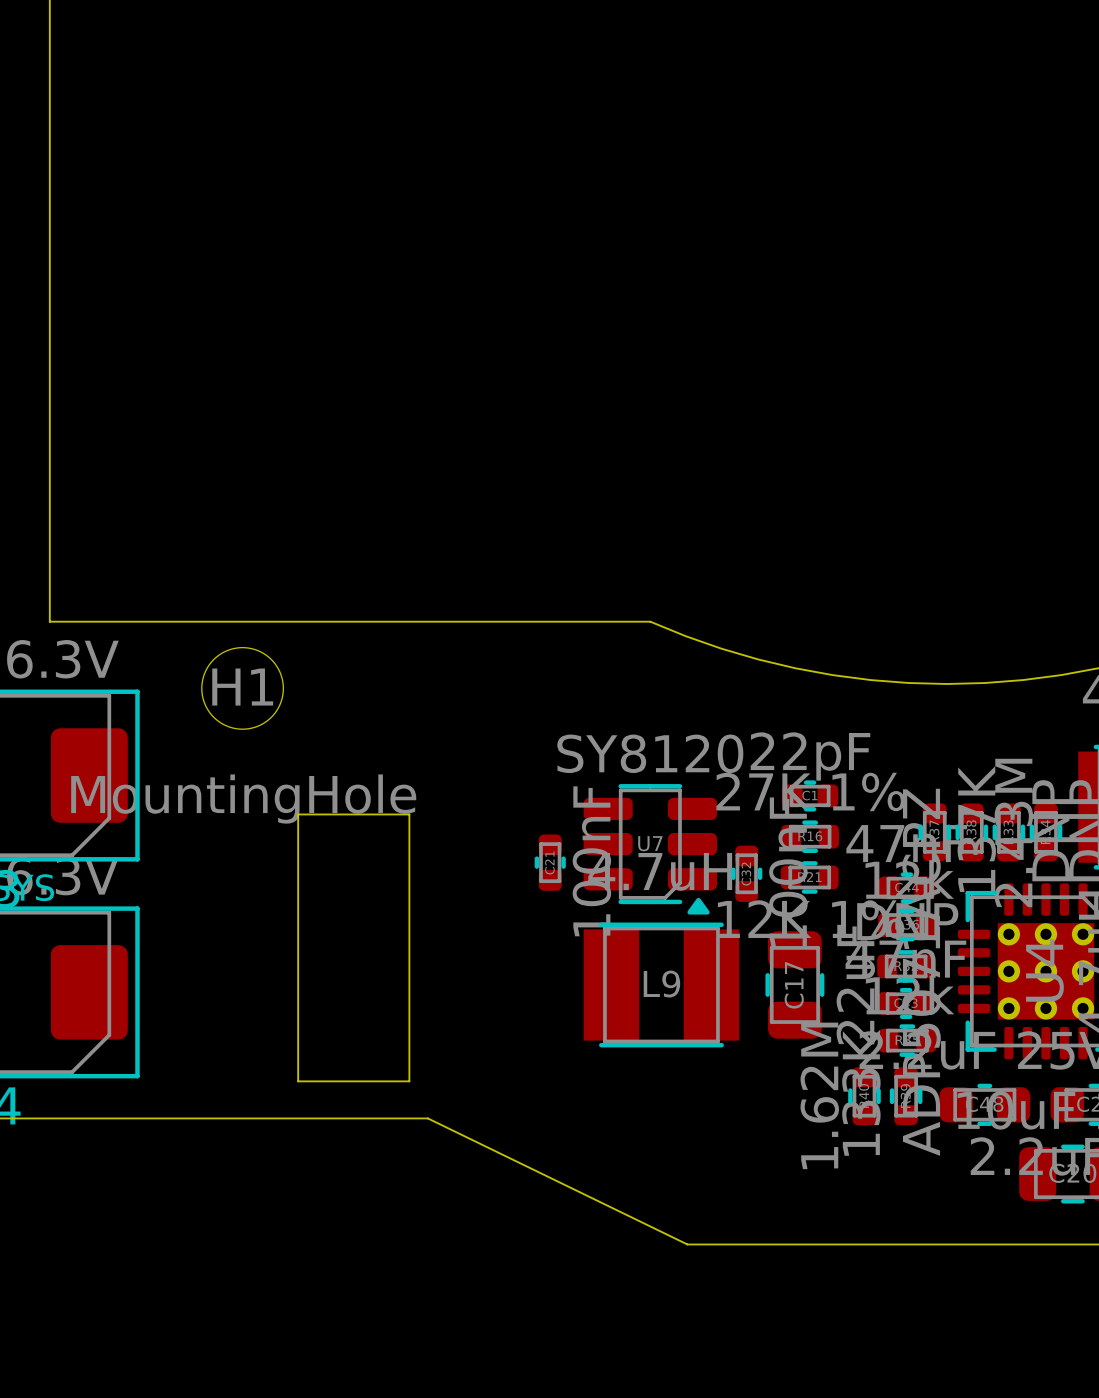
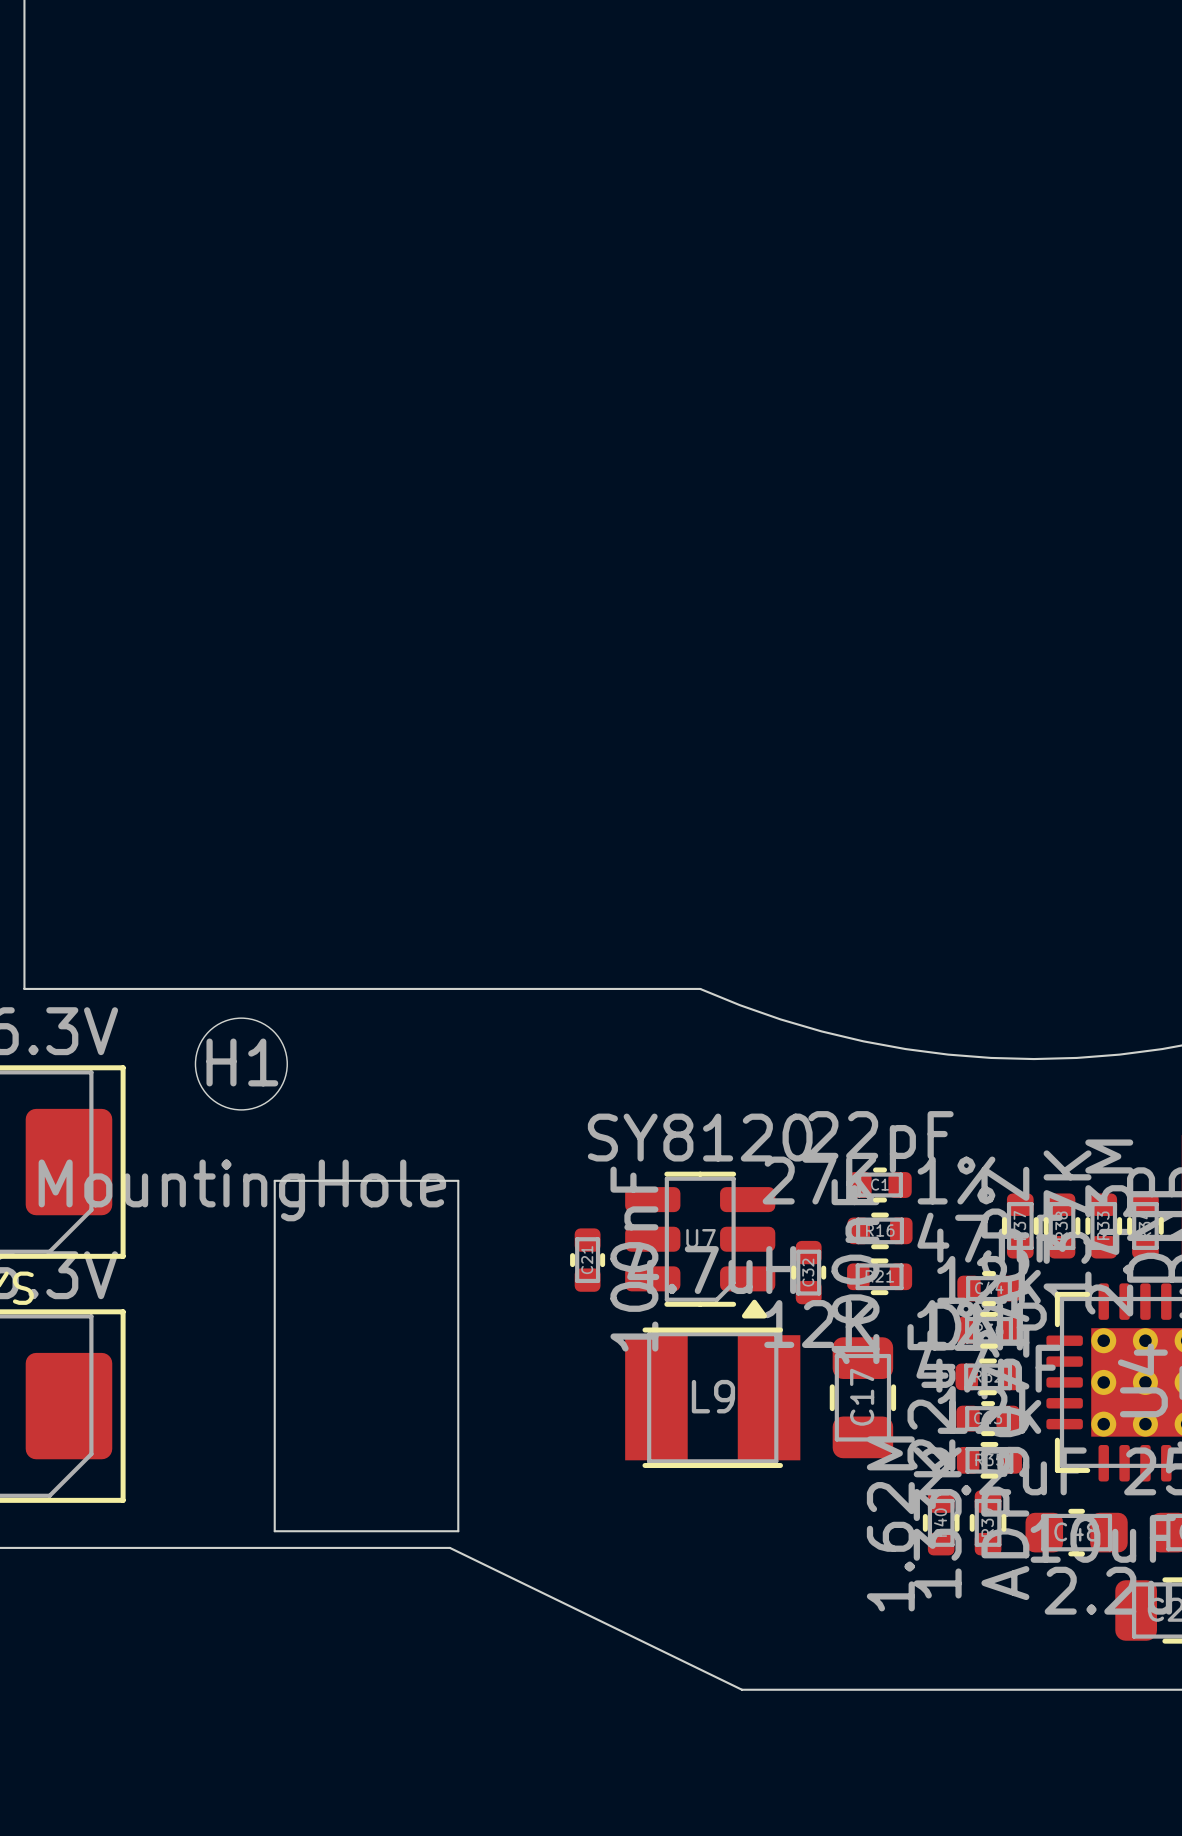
board edge: (298, 814) (409, 814) (409, 1081) (298, 1081) (298, 814) -> (274, 1180) (274, 1531) (458, 1531) (458, 1180) (274, 1180)

